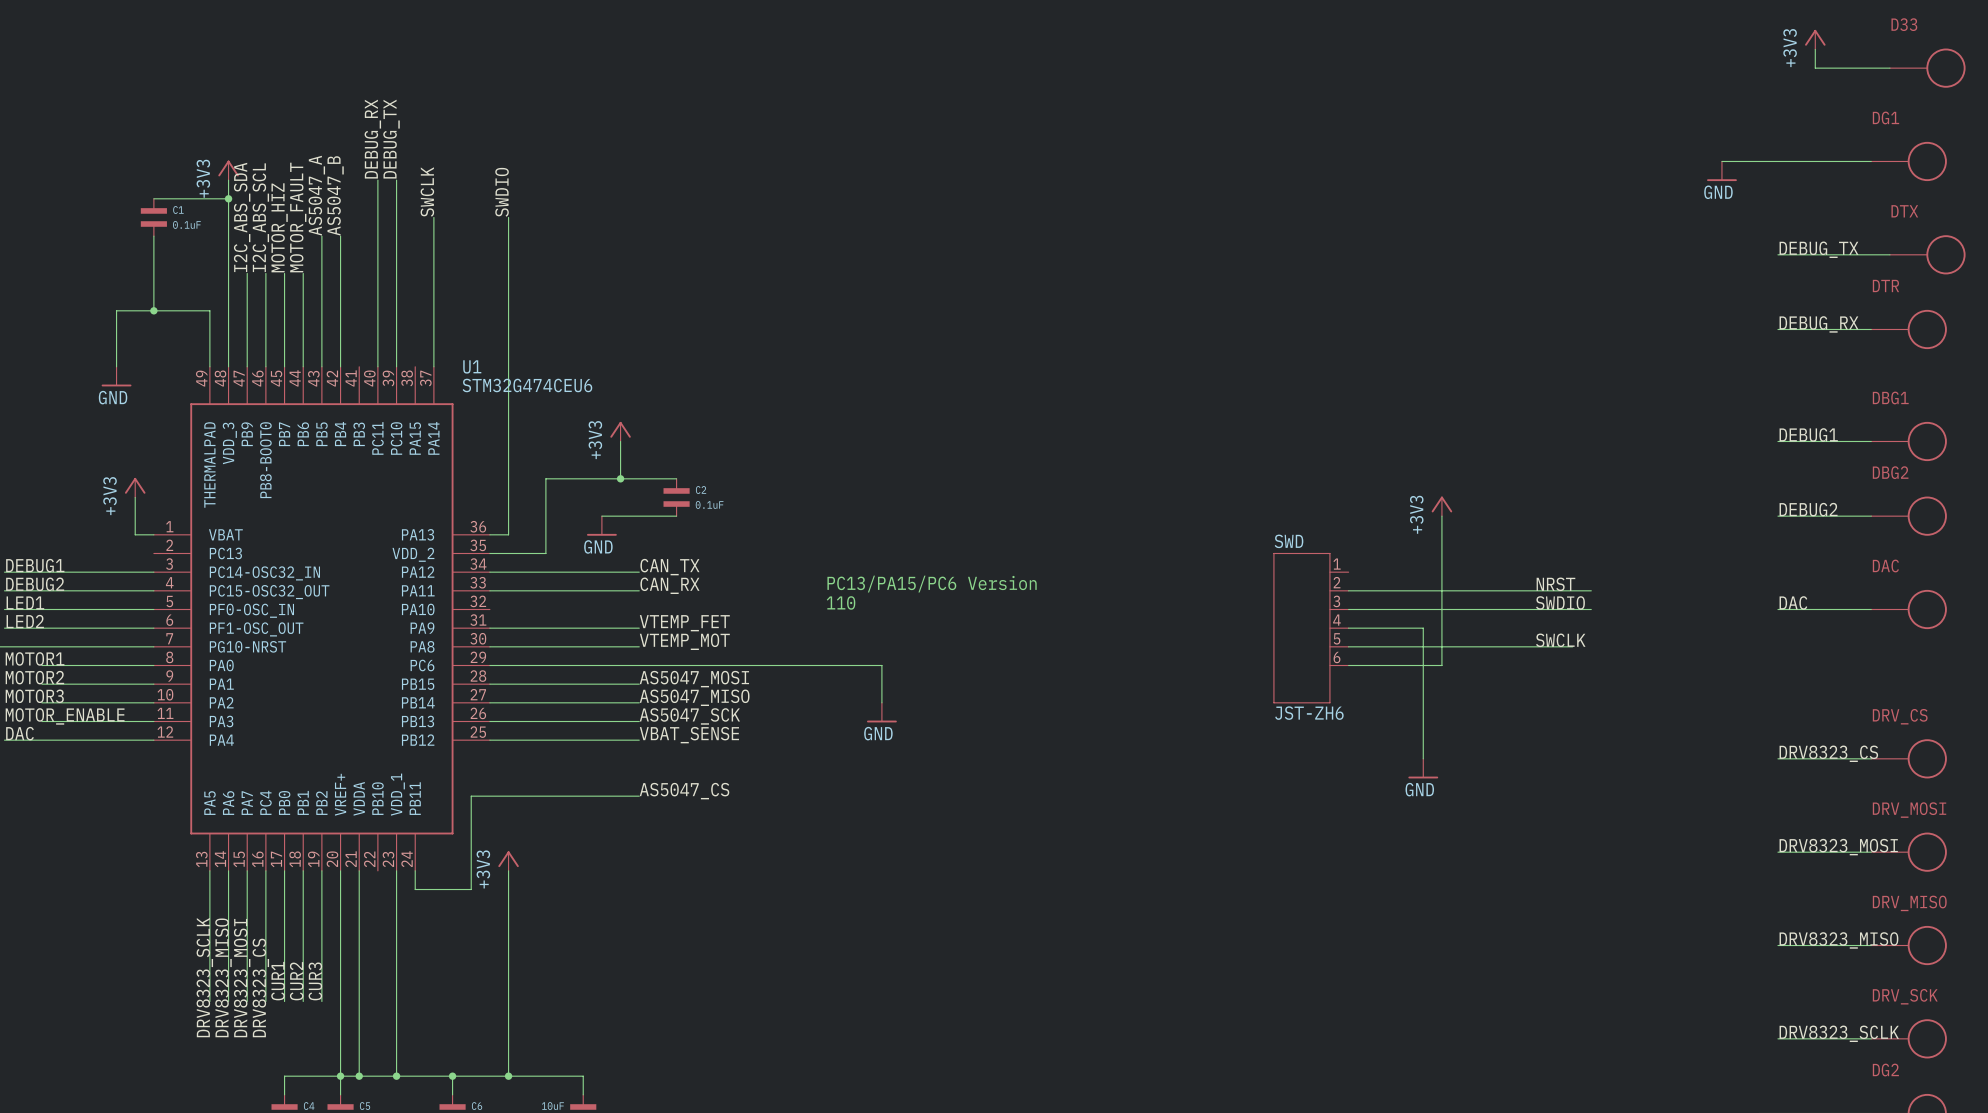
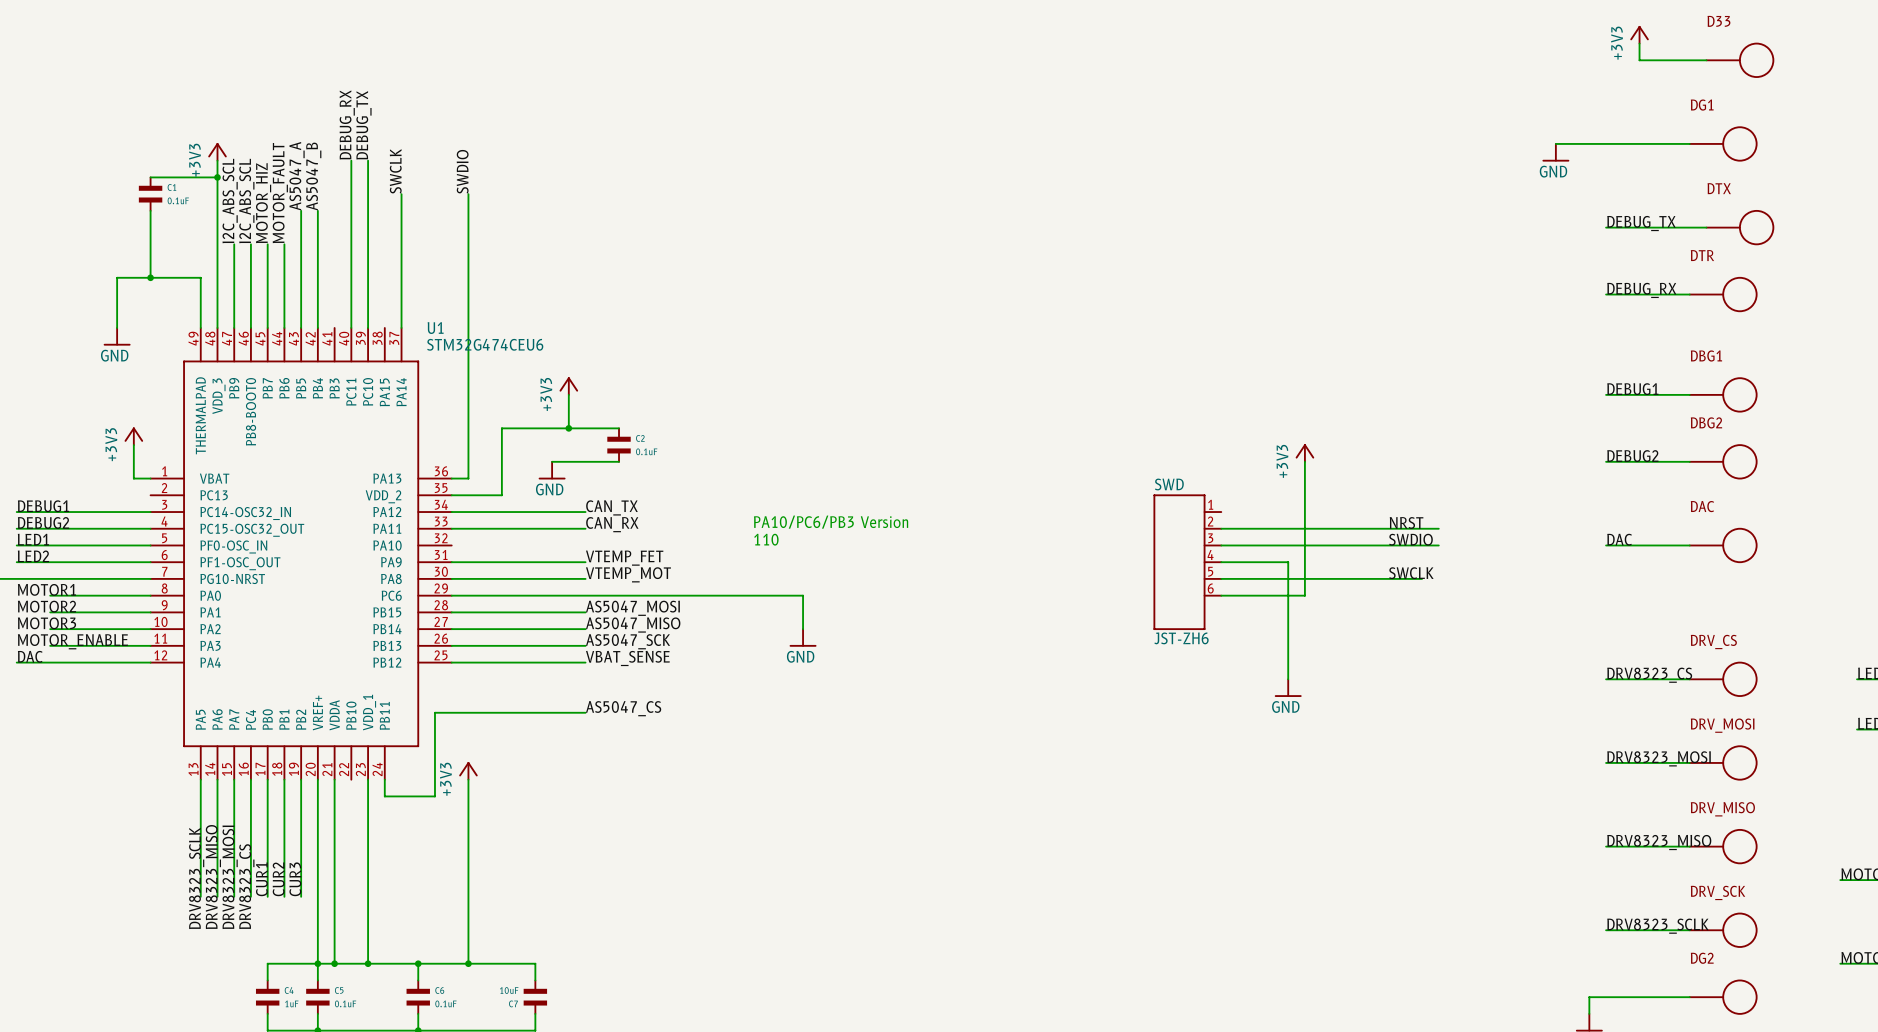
label: I2C_ABS_SDA (242, 217) -> I2C_ABS_SCL (230, 201)
text: PC13/PA15/PC6 Version (932, 584) -> PA10/PC6/PB3 Version (831, 522)

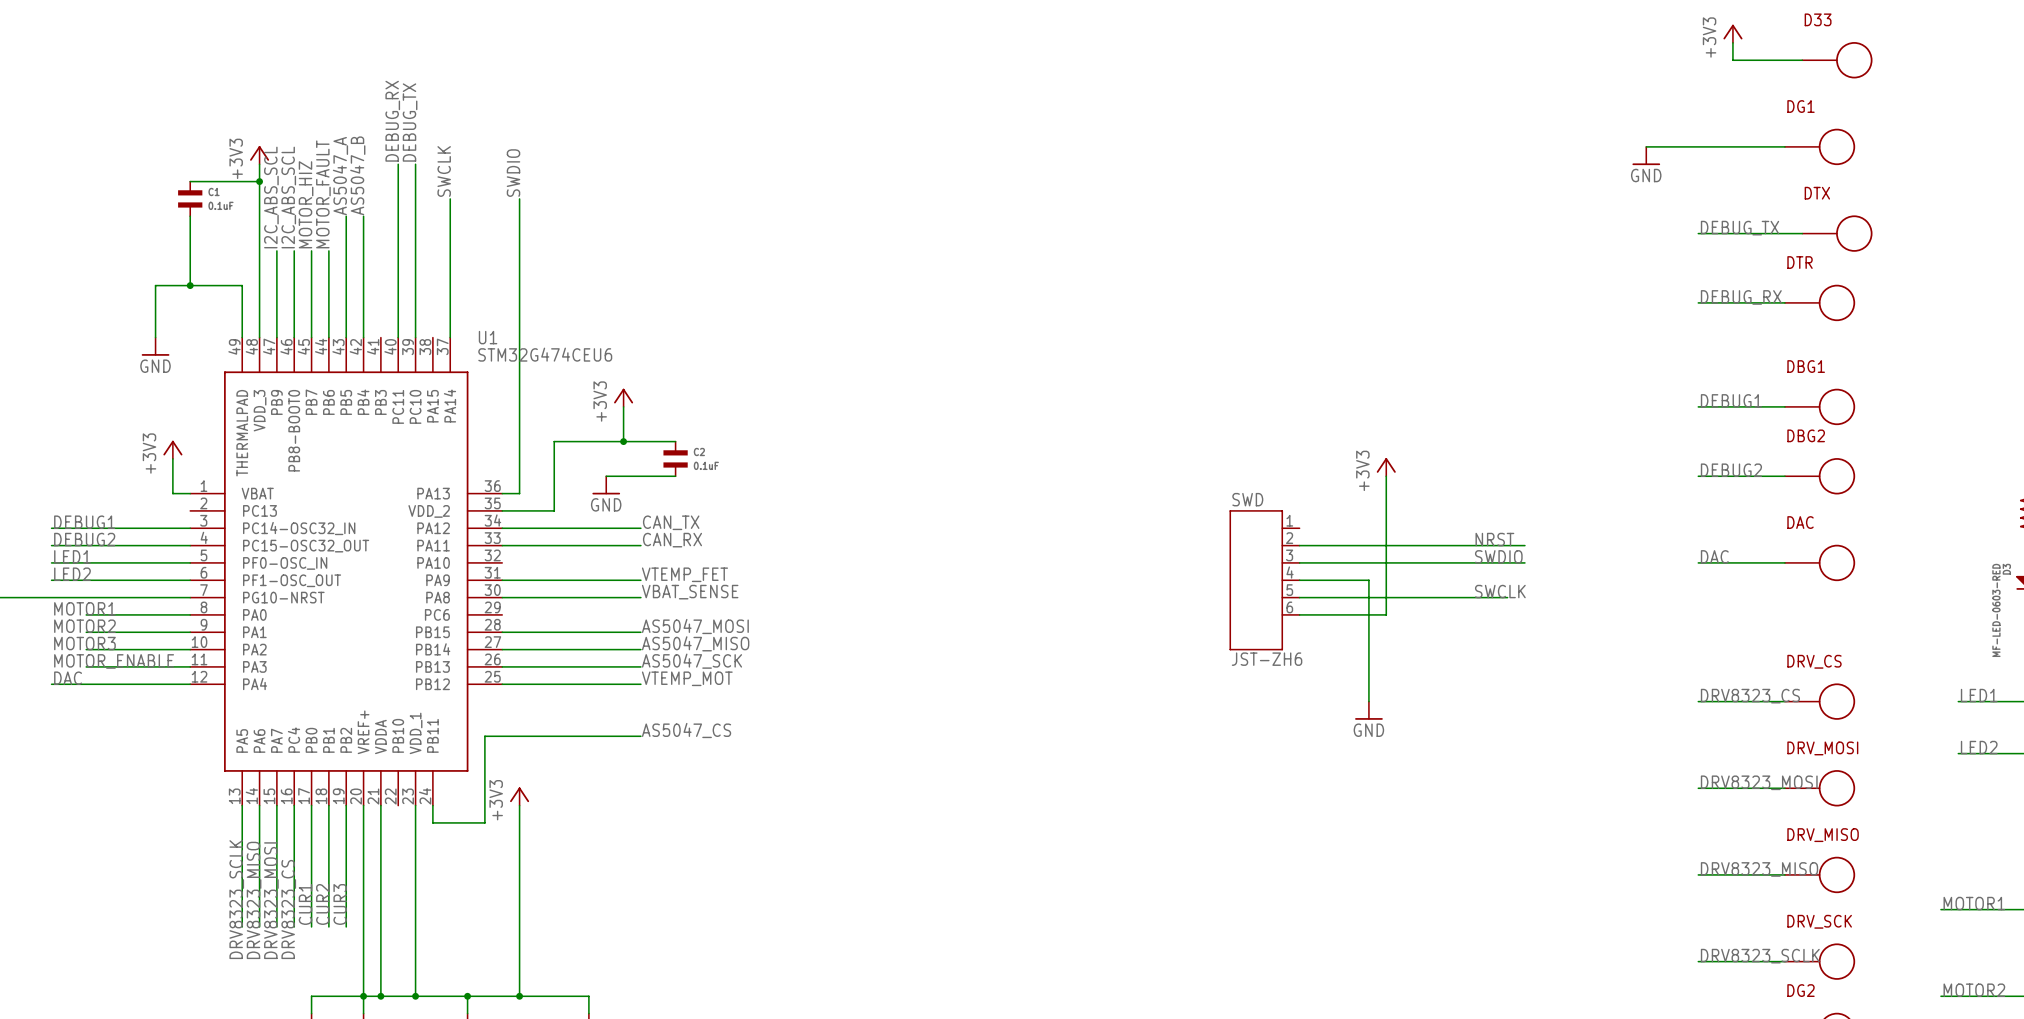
text: PA10/PC6/PB3 Version (831, 522) -> none
text: 110 (766, 539) -> none
label: VTEMP_MOT (628, 574) -> VBAT_SENSE (690, 592)
wire: (451, 595) (803, 595) (803, 629) -> none
power symbol: GND (803, 637) -> none
label: VBAT_SENSE (627, 658) -> VTEMP_MOT (687, 678)

